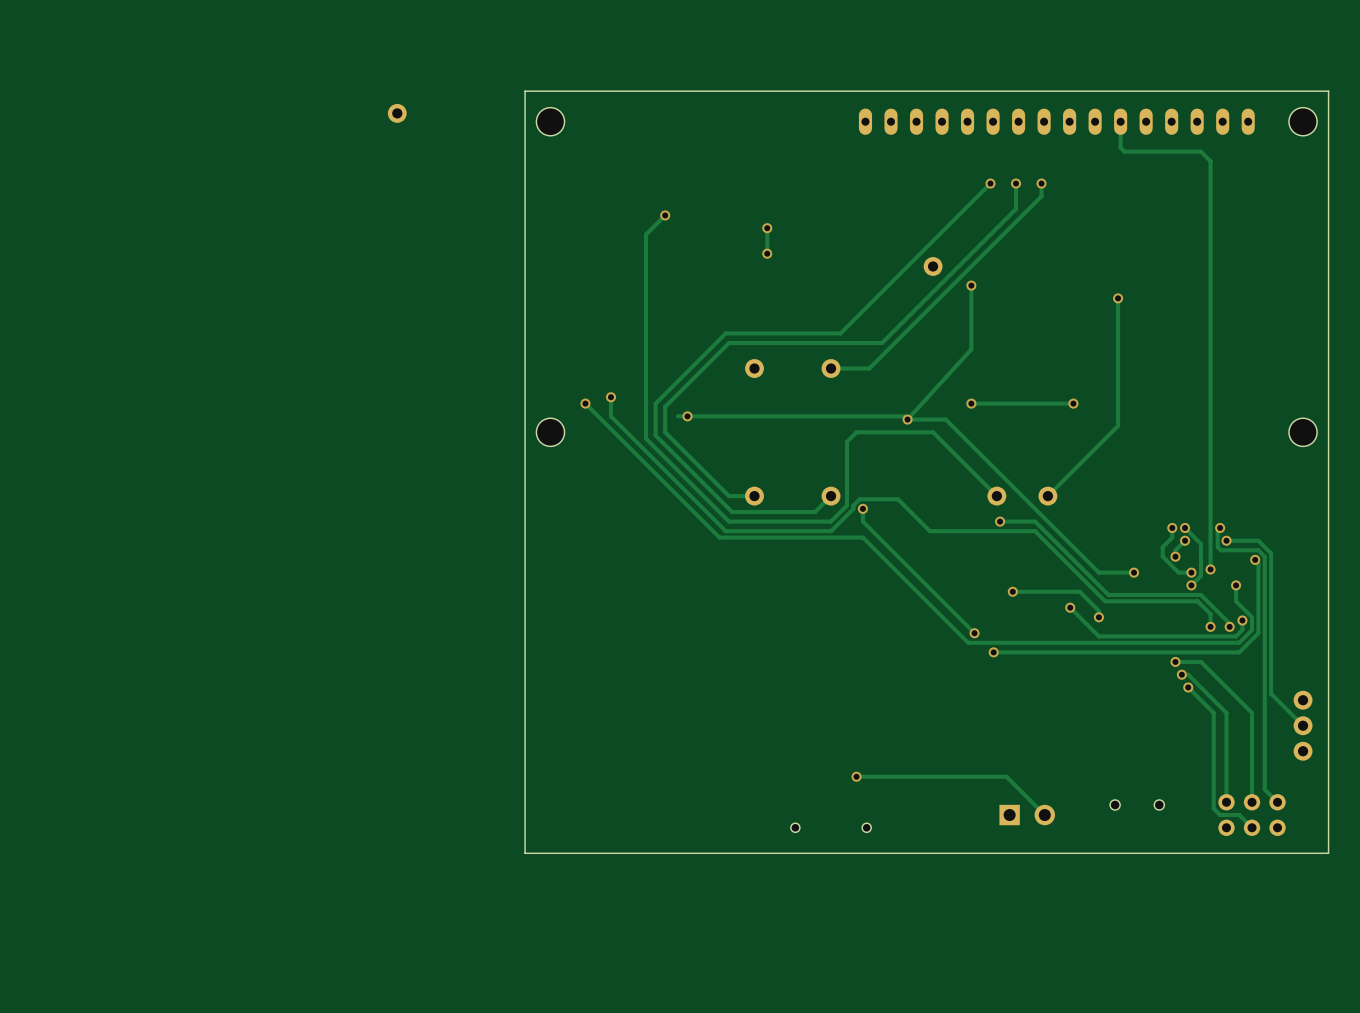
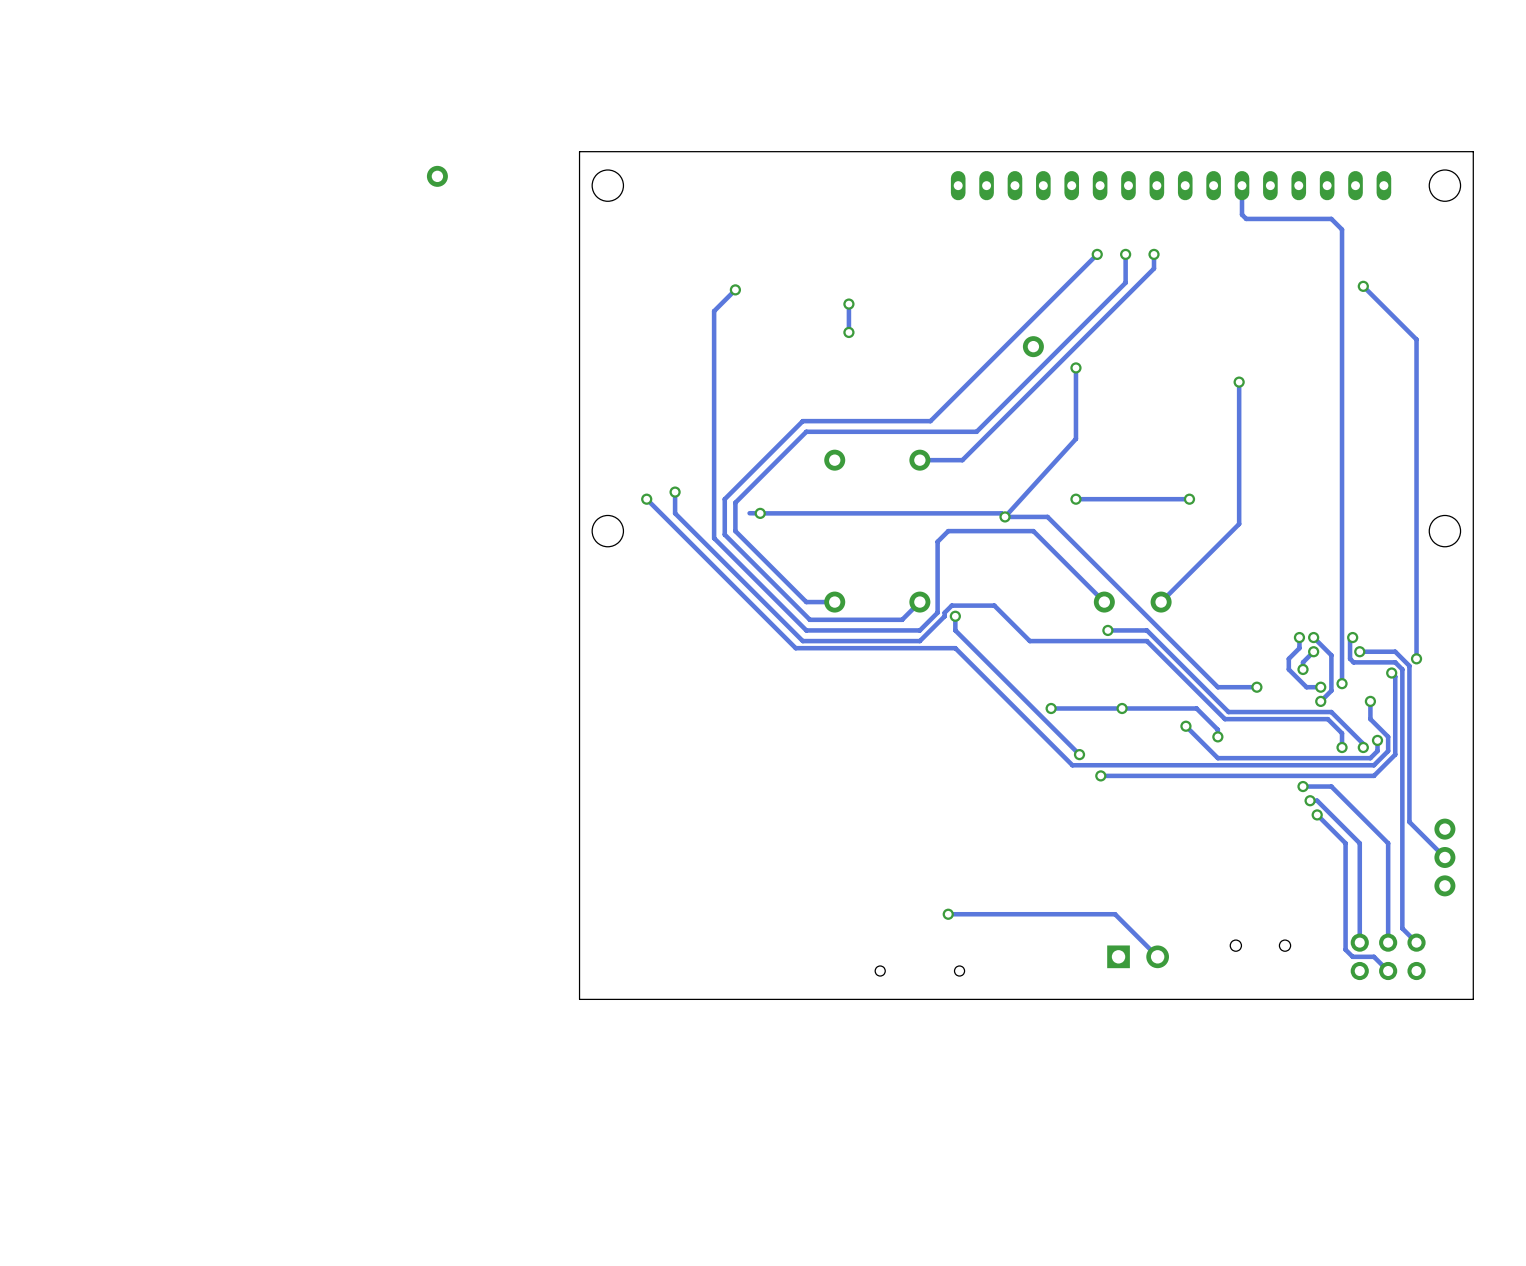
track: none -> (1363, 286) (1416, 339) (1416, 658)
via: none -> (1363, 286)
via: none -> (1416, 658)
via: none -> (1051, 708)
track: none -> (1122, 708) (1051, 708)

